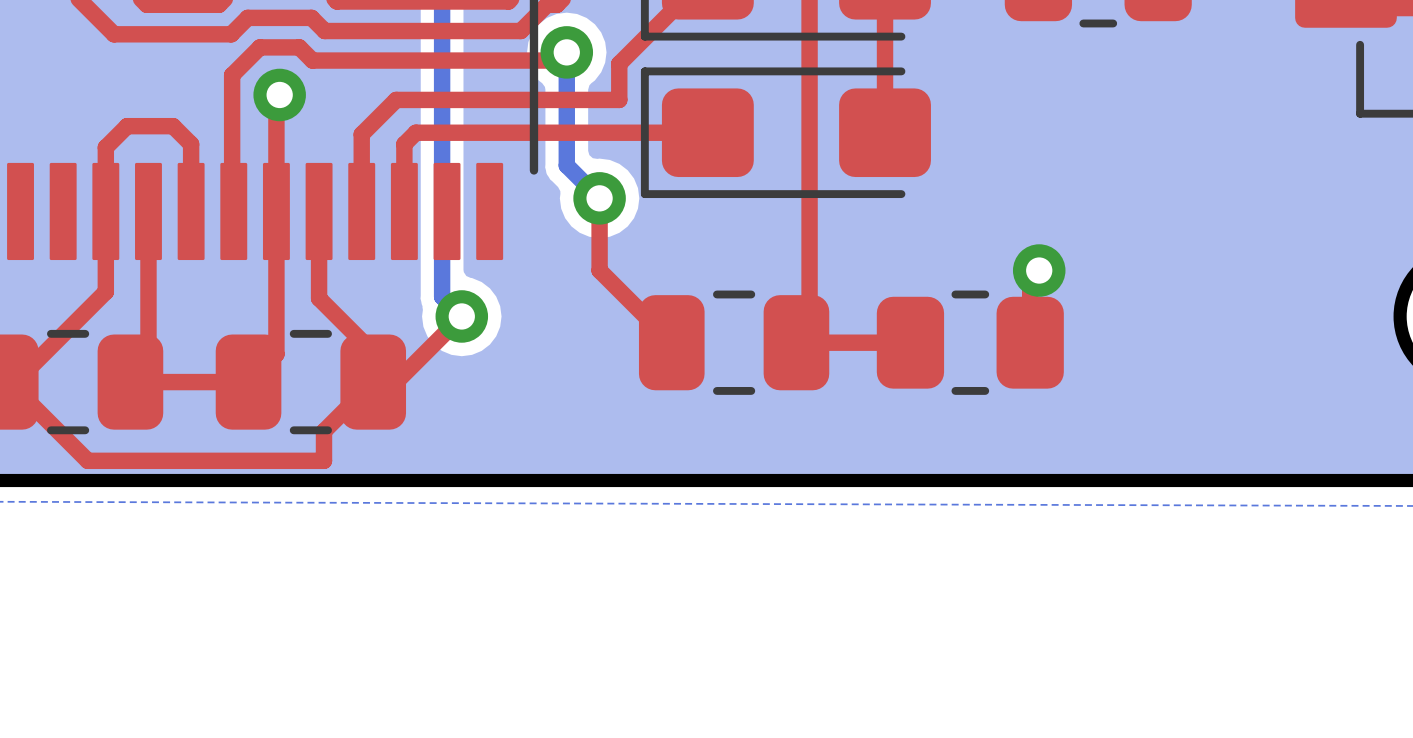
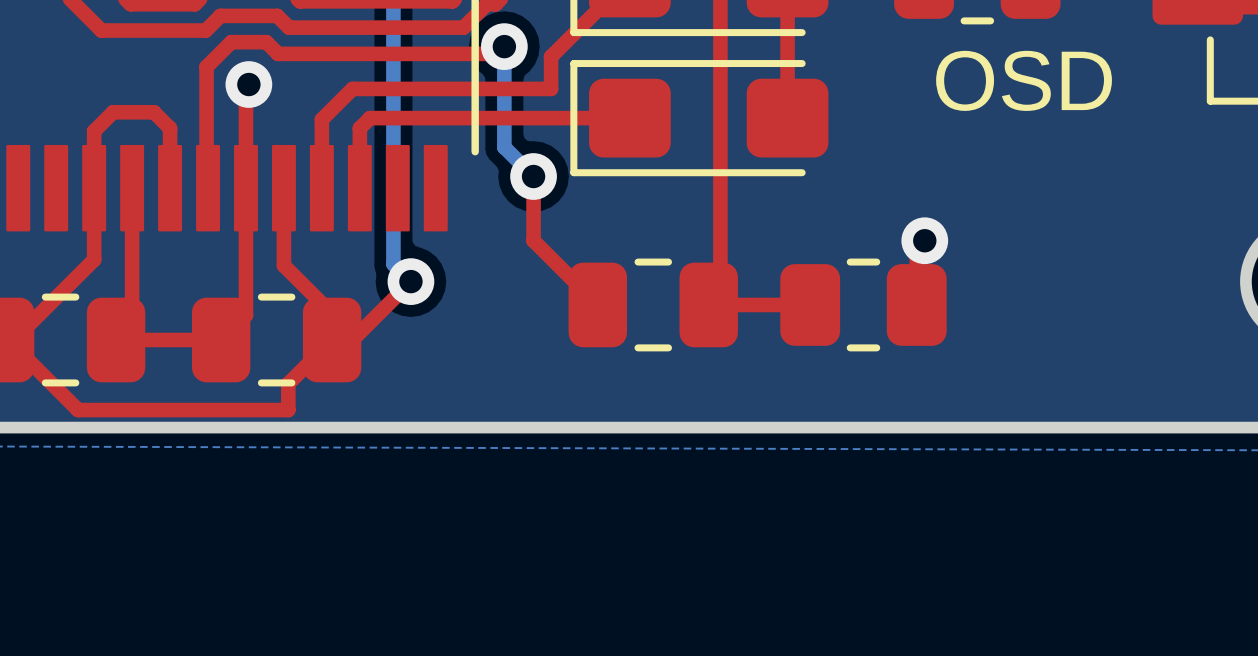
OSD name: none -> OSD (1024, 80)

